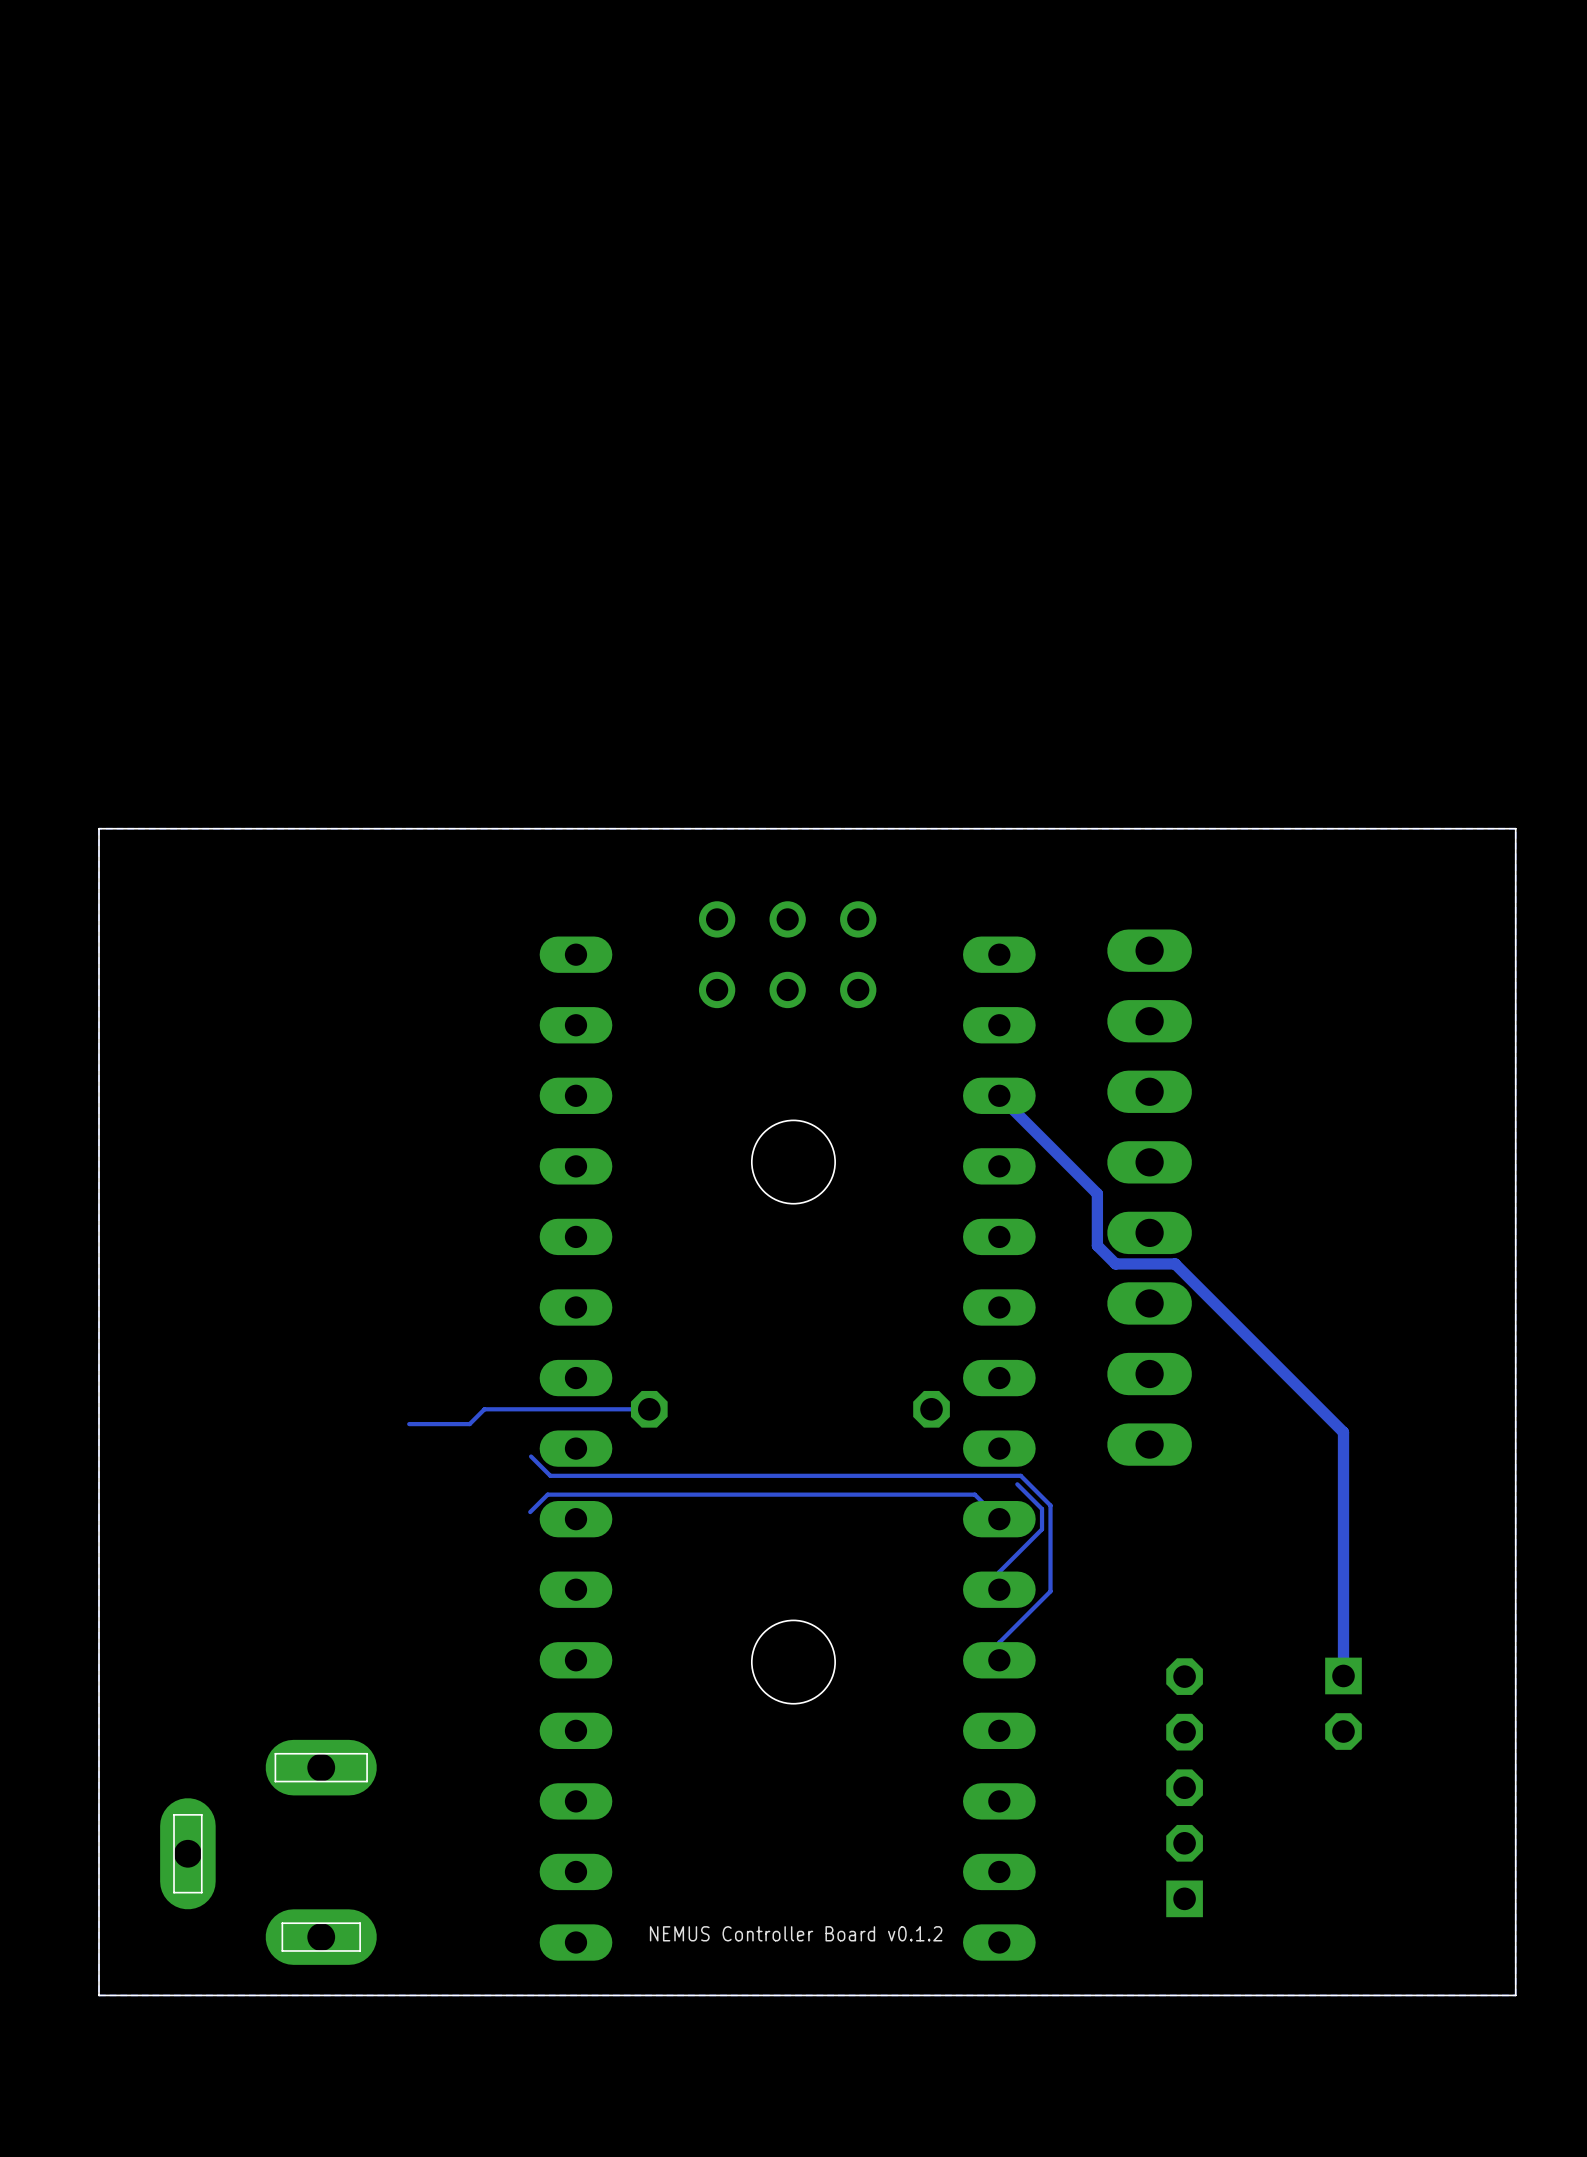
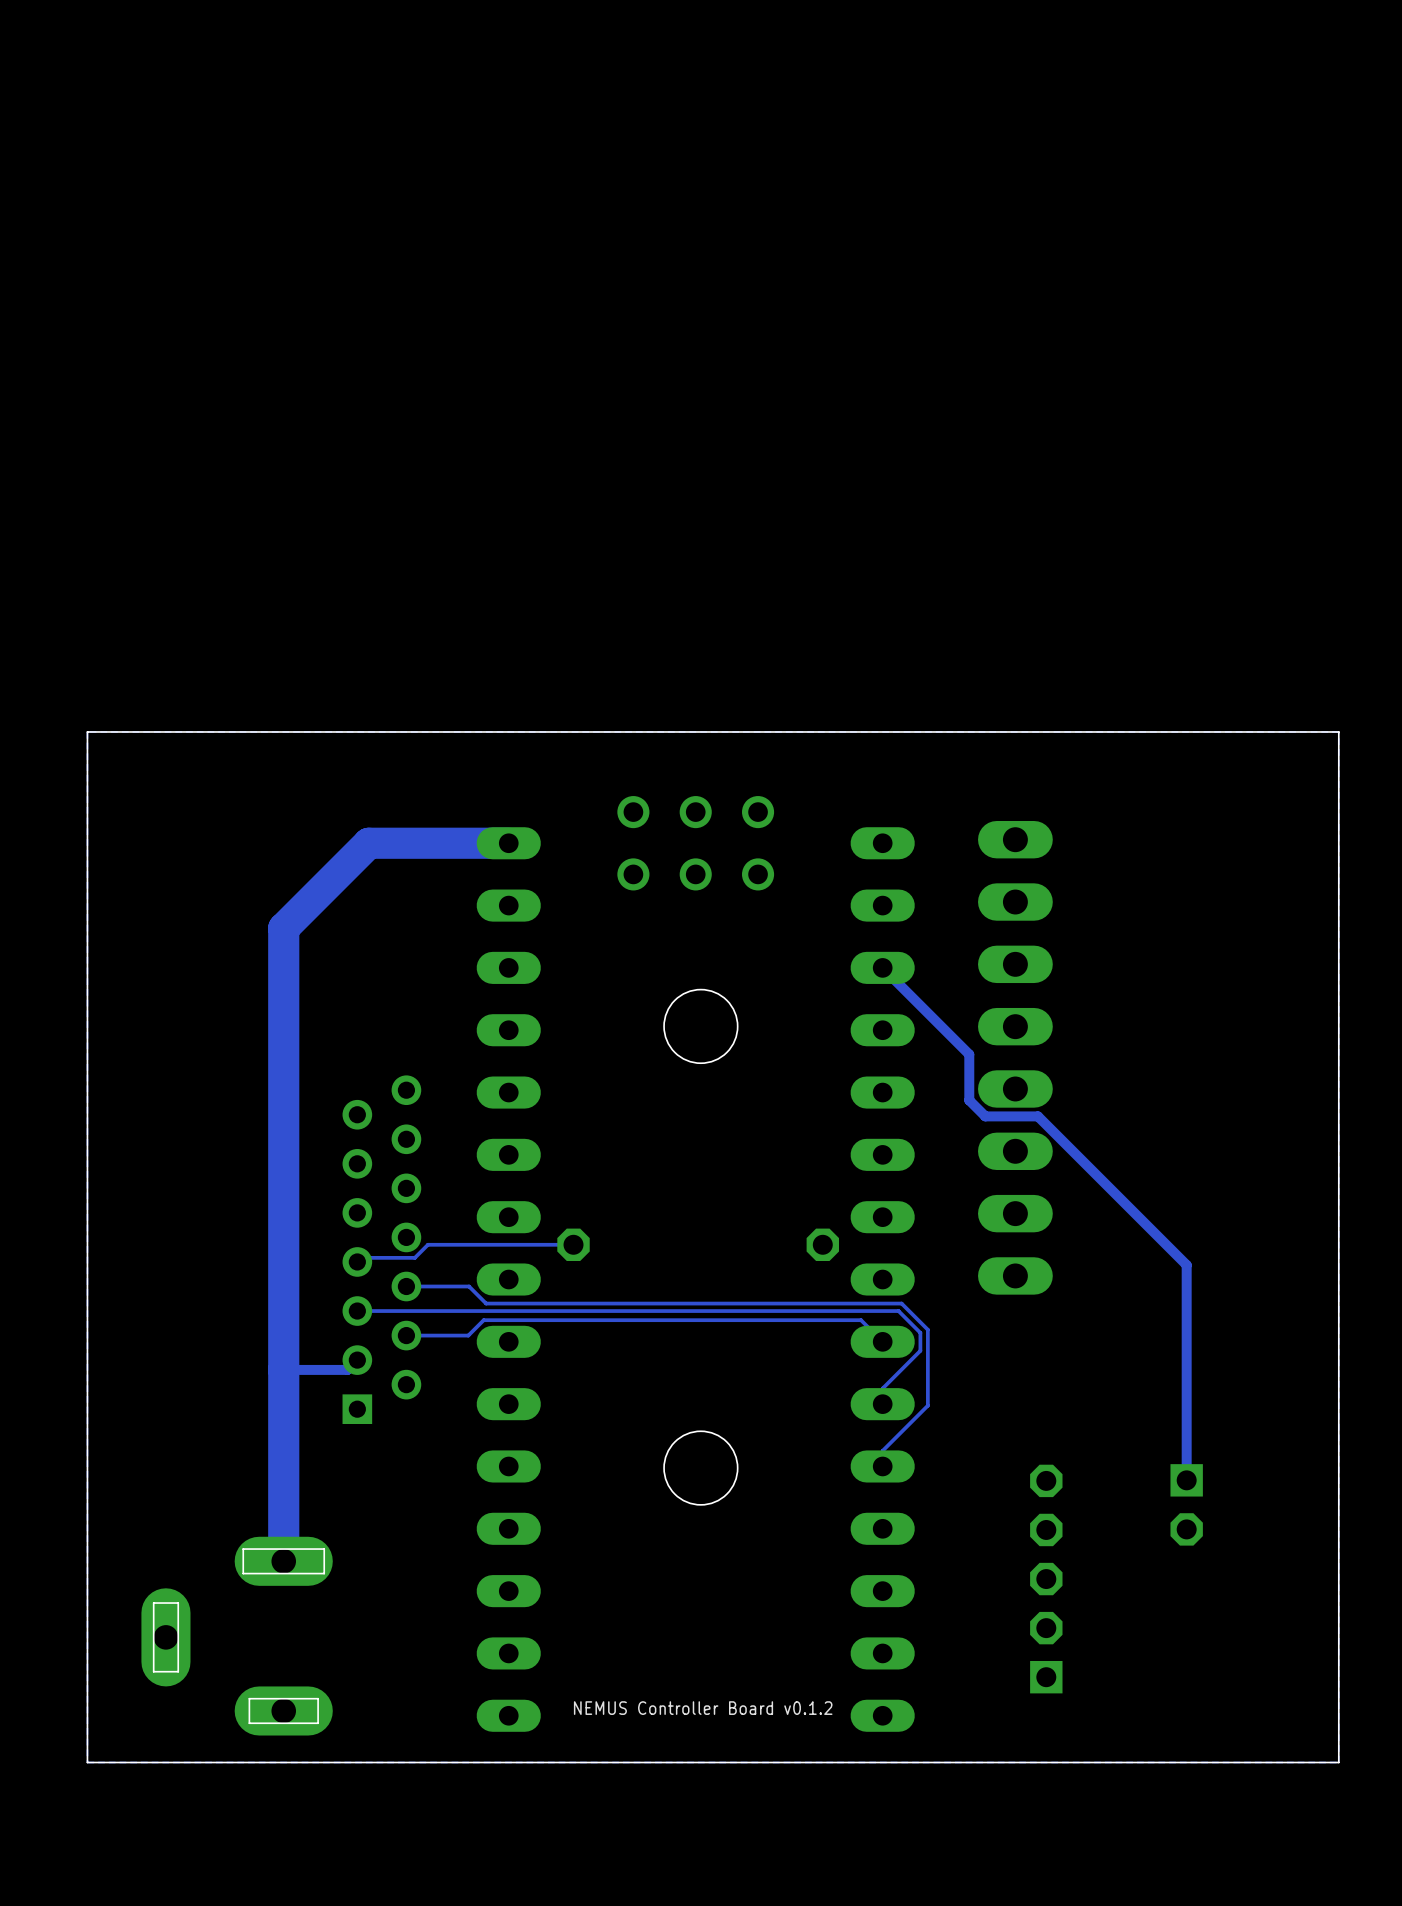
track: none -> (508, 843) (368, 843) (283, 928) (283, 1561)
part: none -> (381, 1249)
track: none -> (469, 1286) (406, 1286)
track: none -> (898, 1311) (357, 1311)
track: none -> (468, 1335) (406, 1335)
track: none -> (357, 1360) (347, 1369) (283, 1369)

